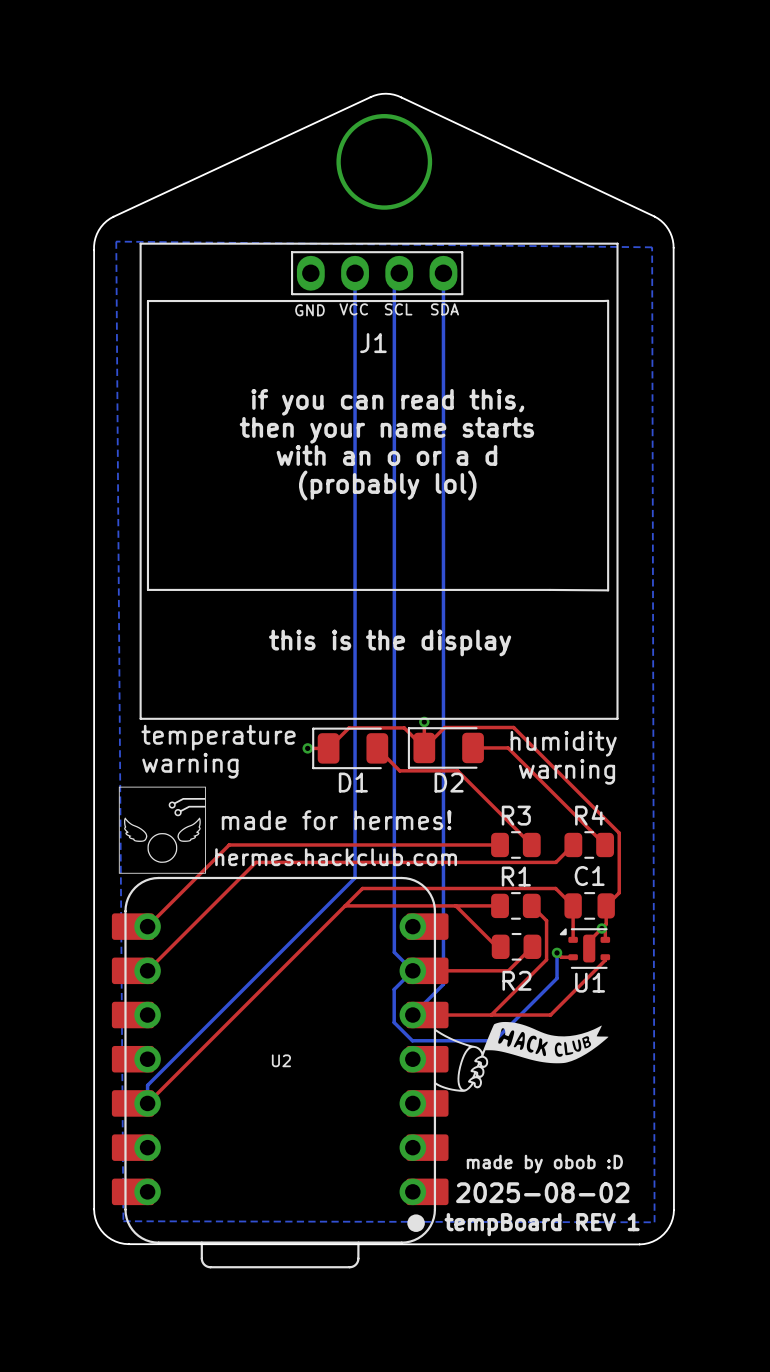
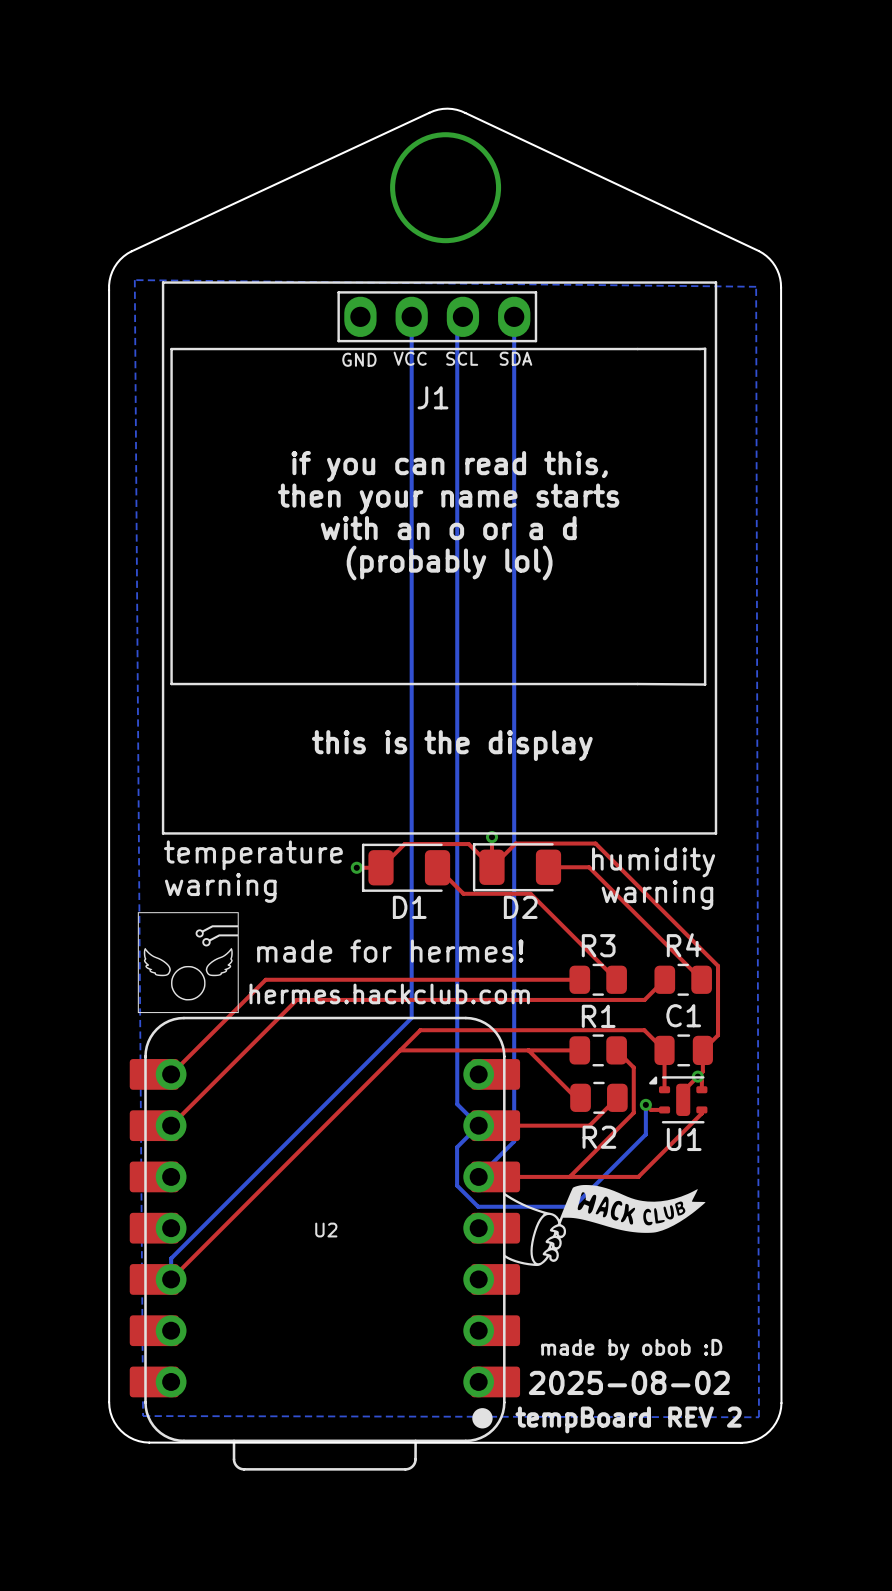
text: tempBoard REV 1 (542, 1224) -> tempBoard REV 2 (628, 1419)

